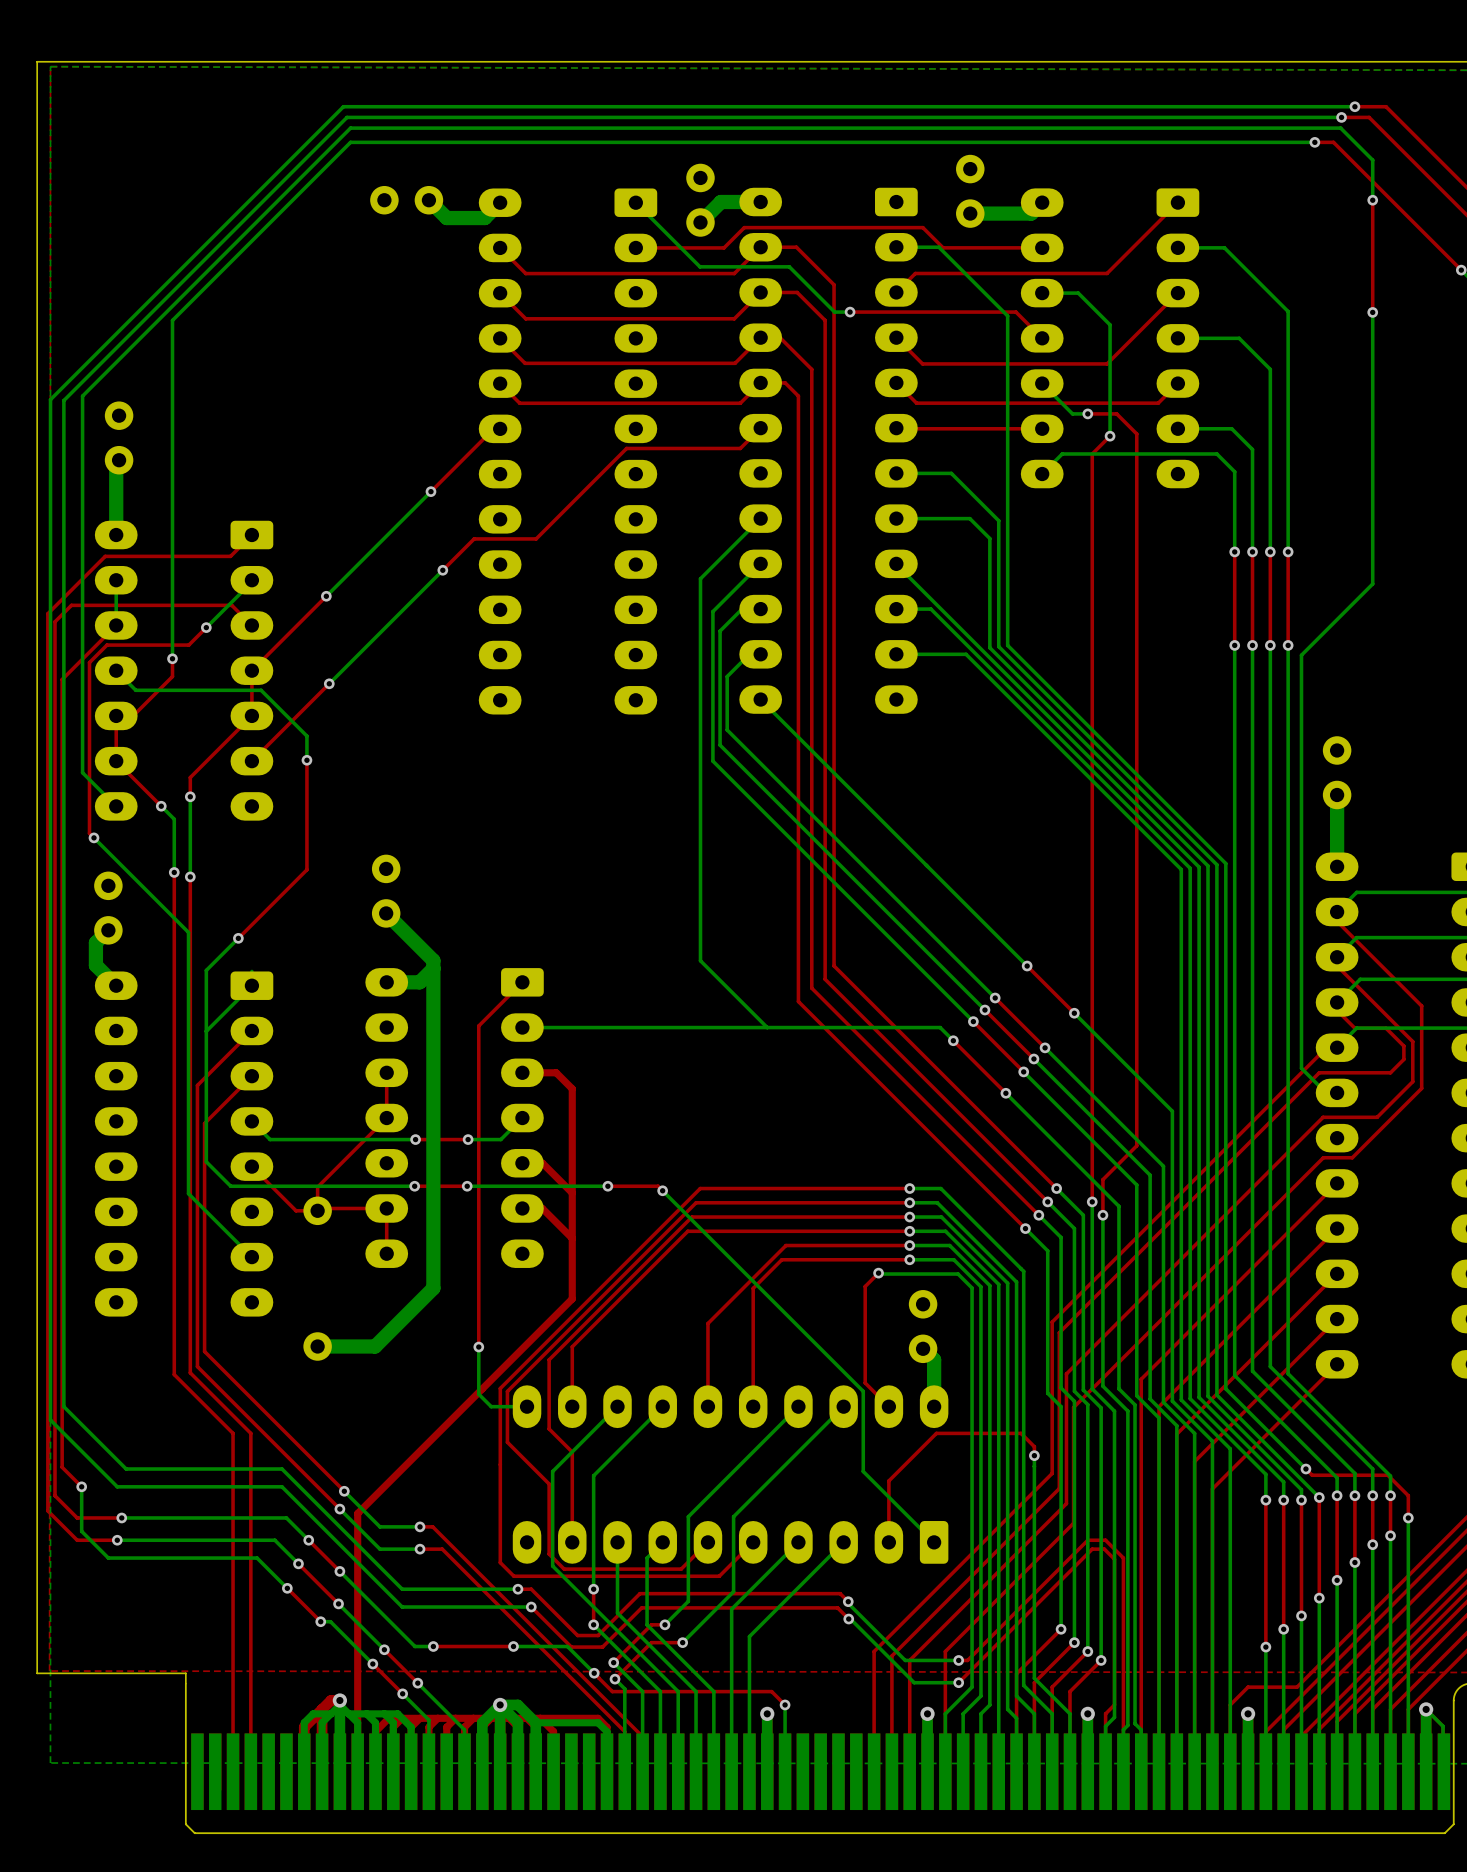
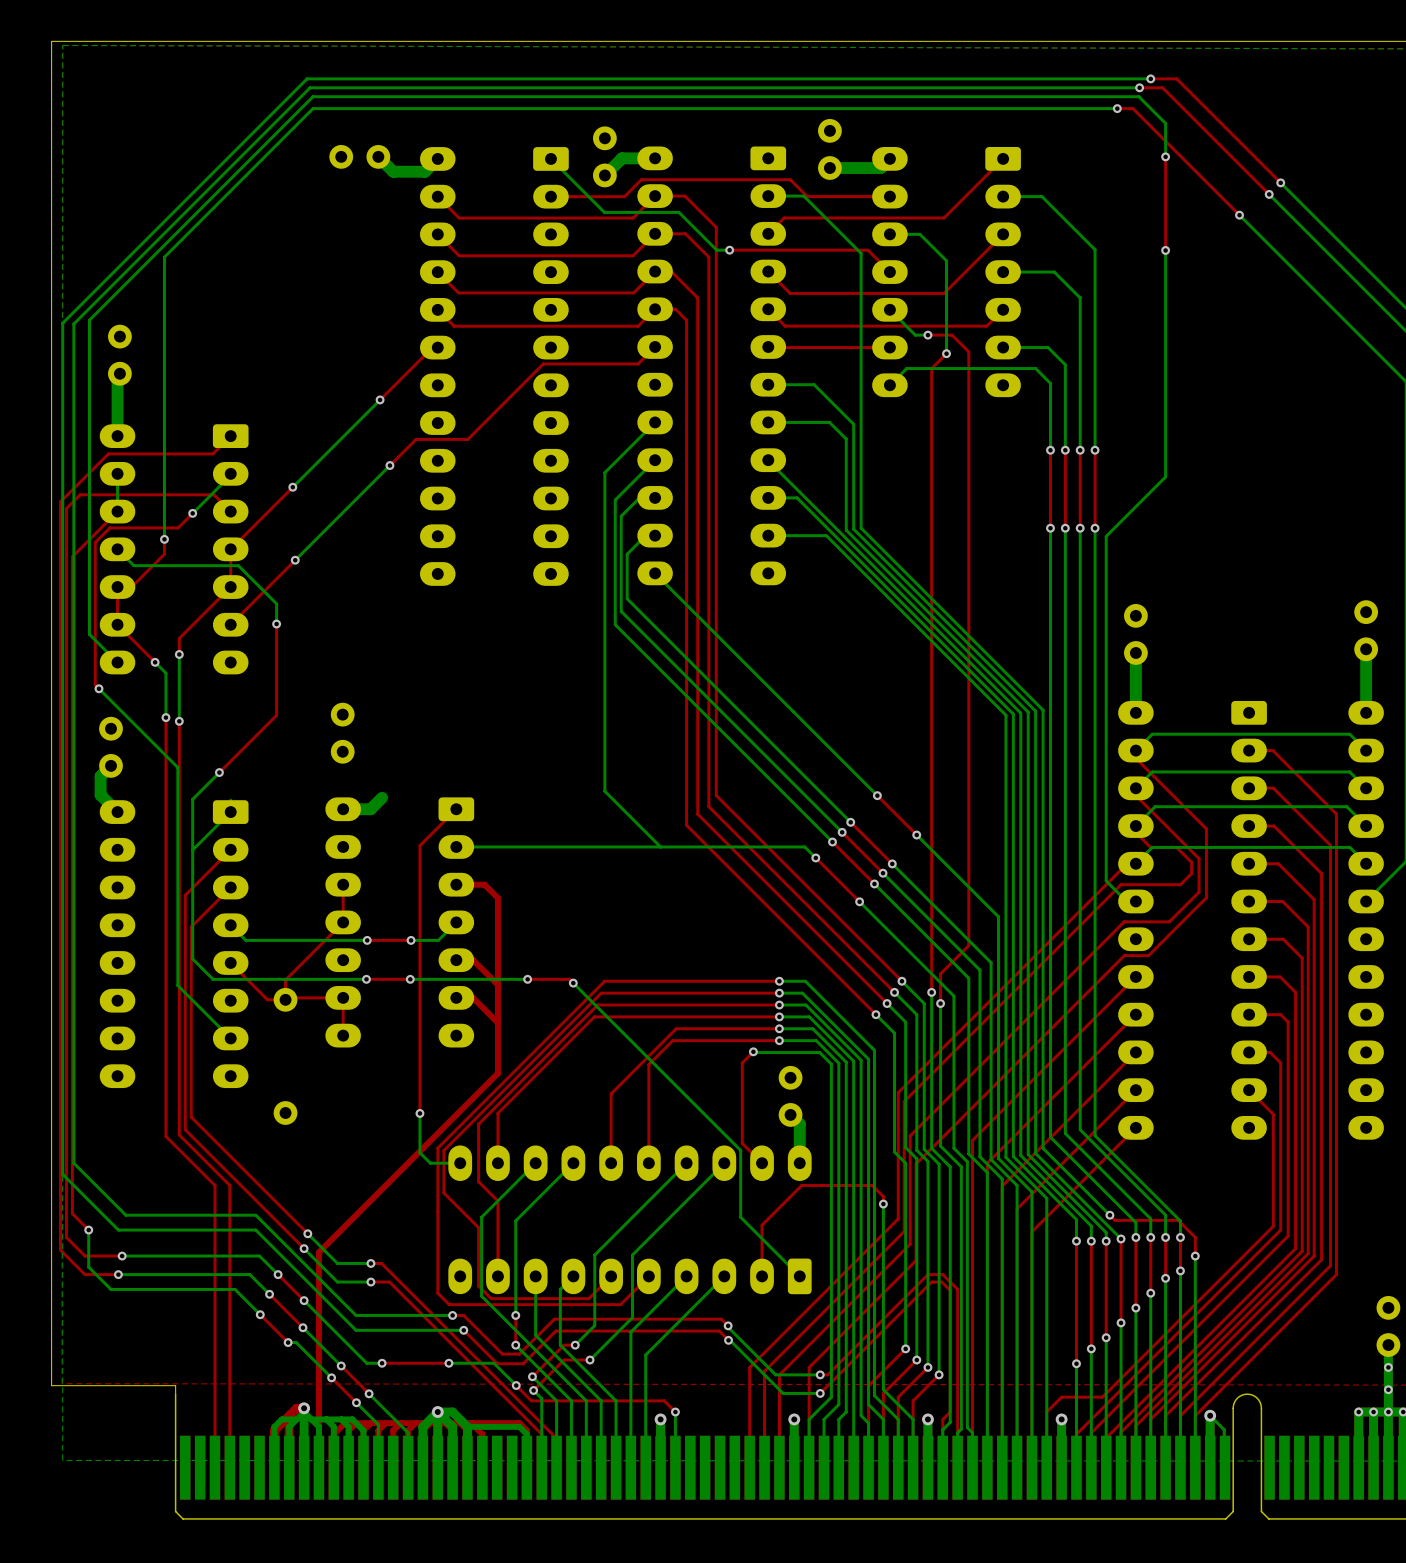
bottom track: (386, 913) (433, 960) (433, 1288) (375, 1346) (317, 1346) -> none

